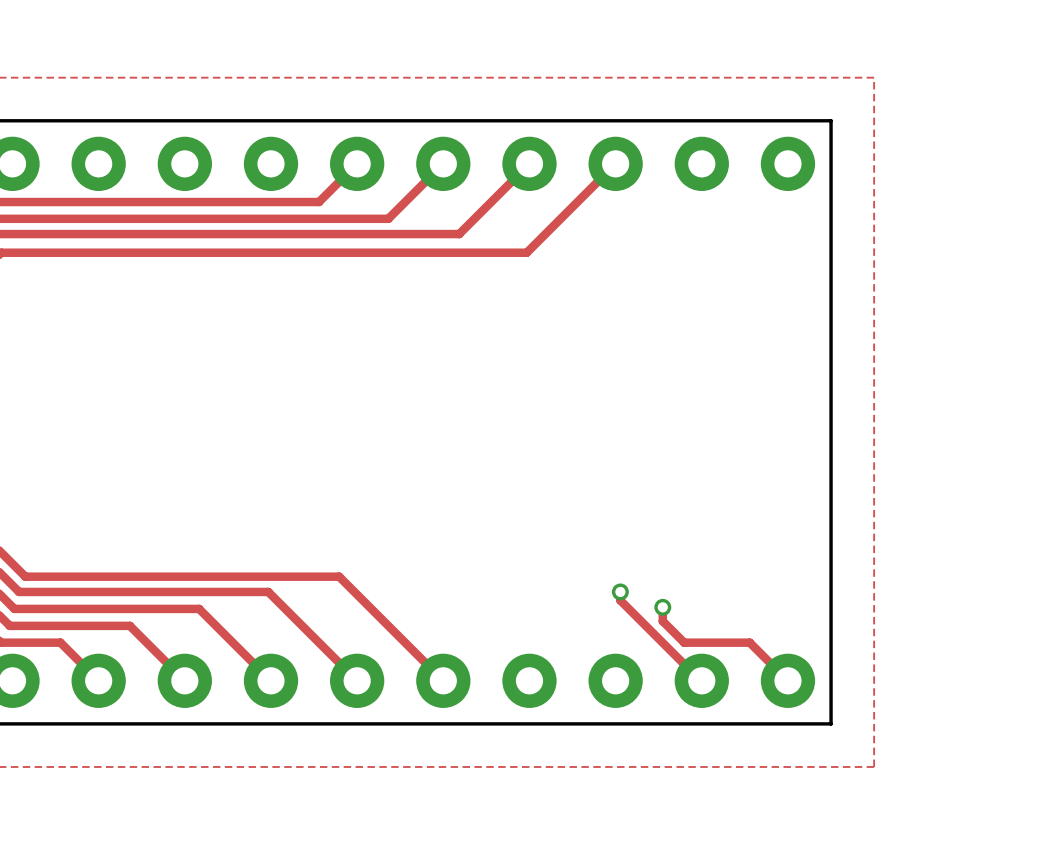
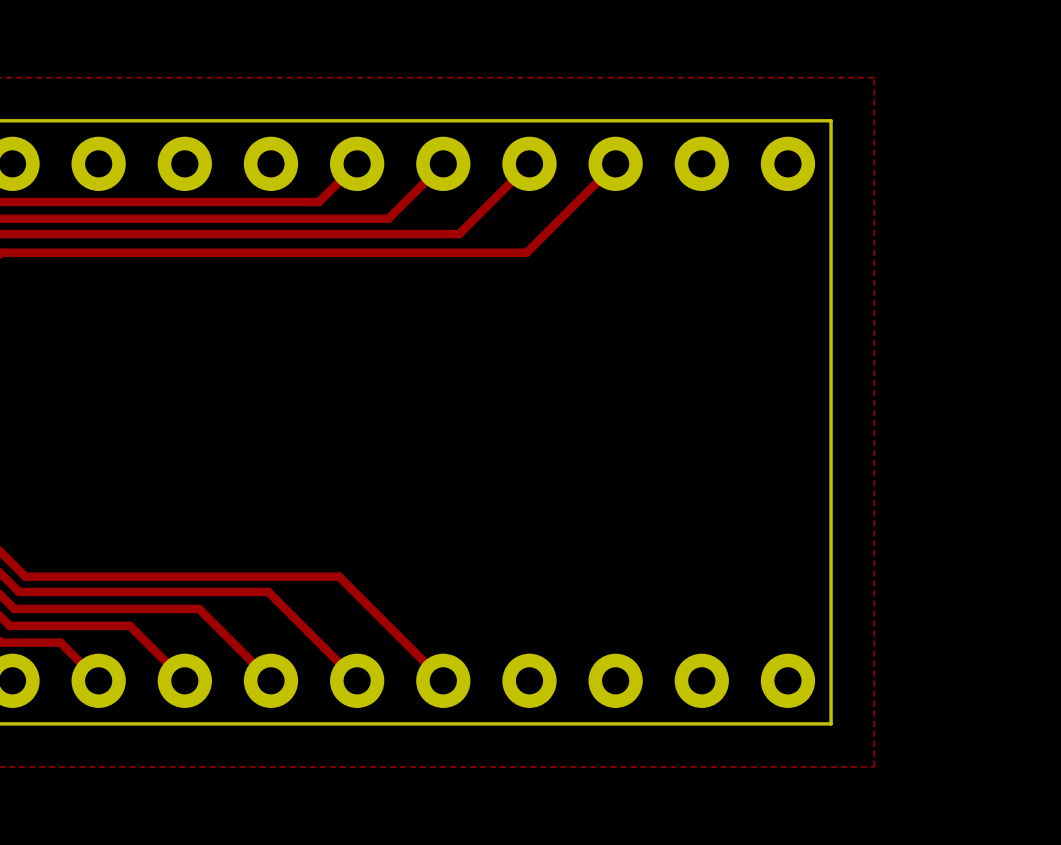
track: (620, 591) (620, 600) (701, 680) -> none
via: (620, 591) -> none
track: (662, 607) (662, 621) (684, 642) (749, 642) (787, 680) -> none
via: (662, 607) -> none

